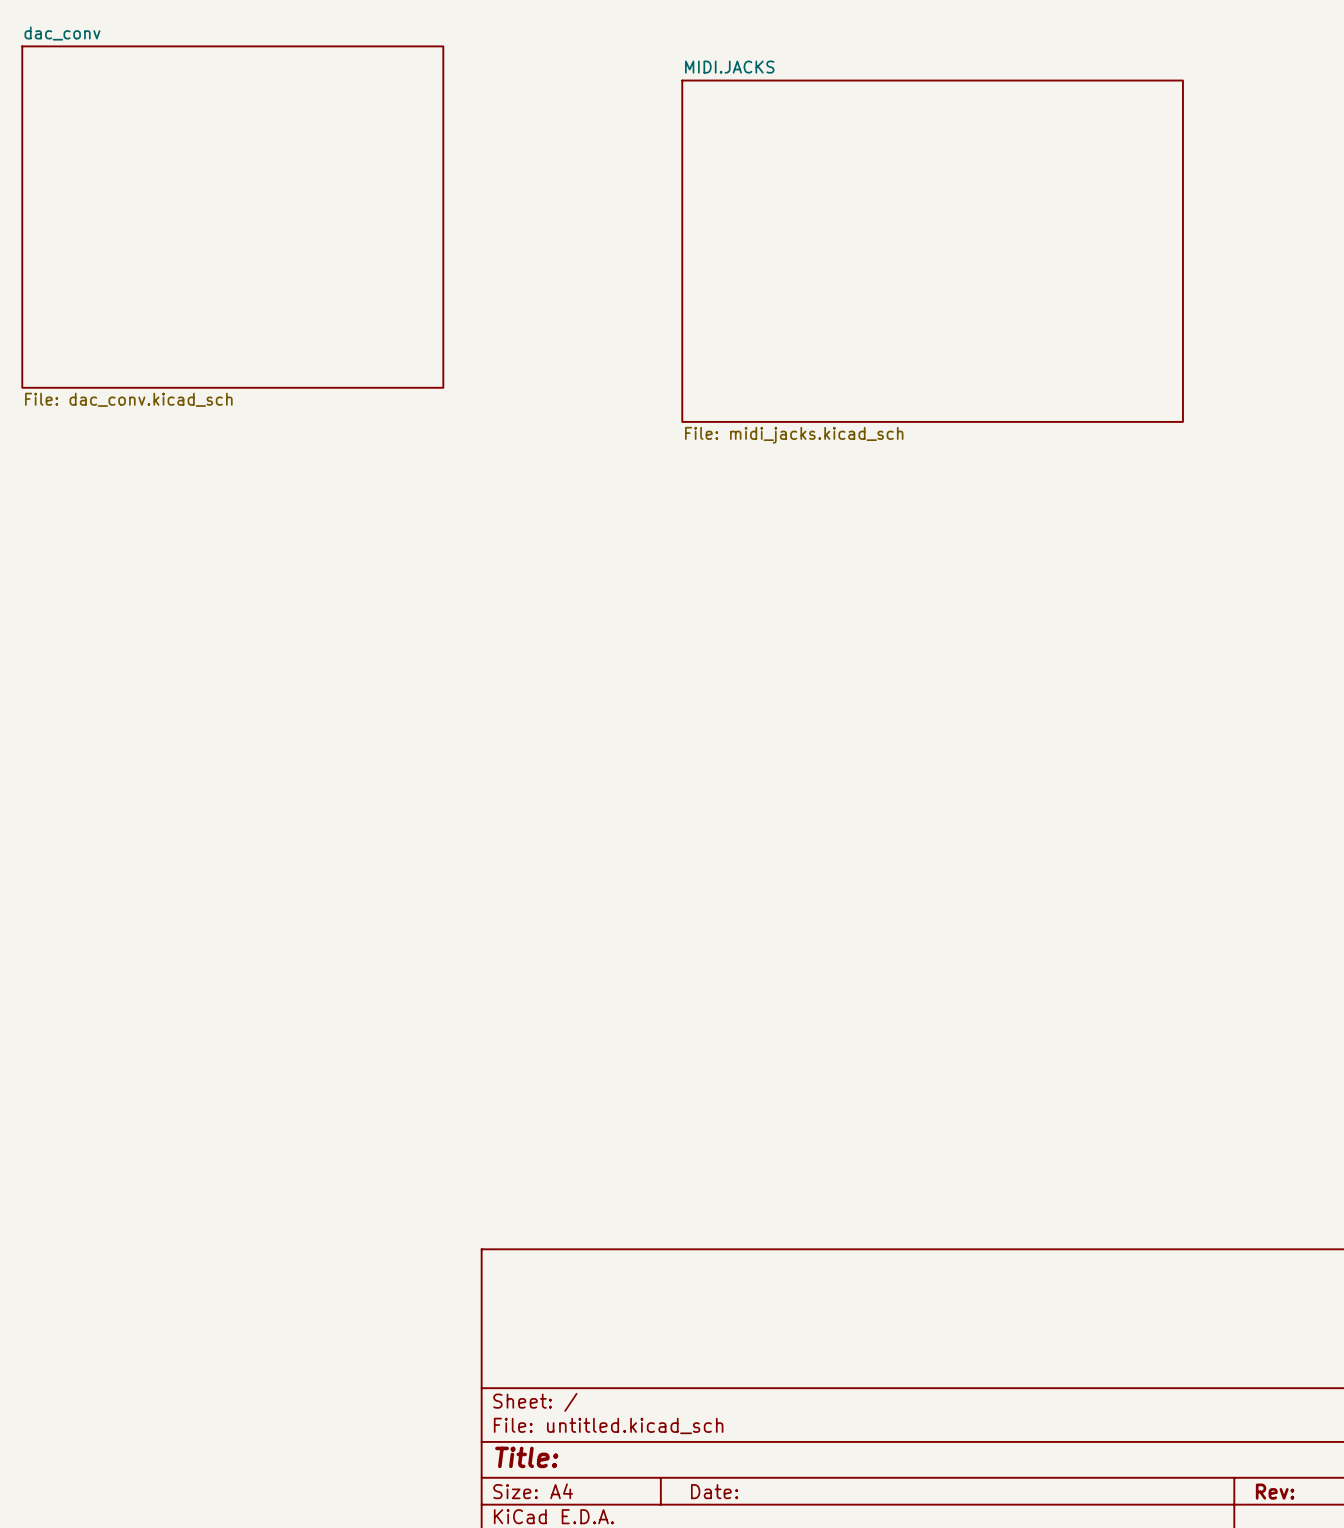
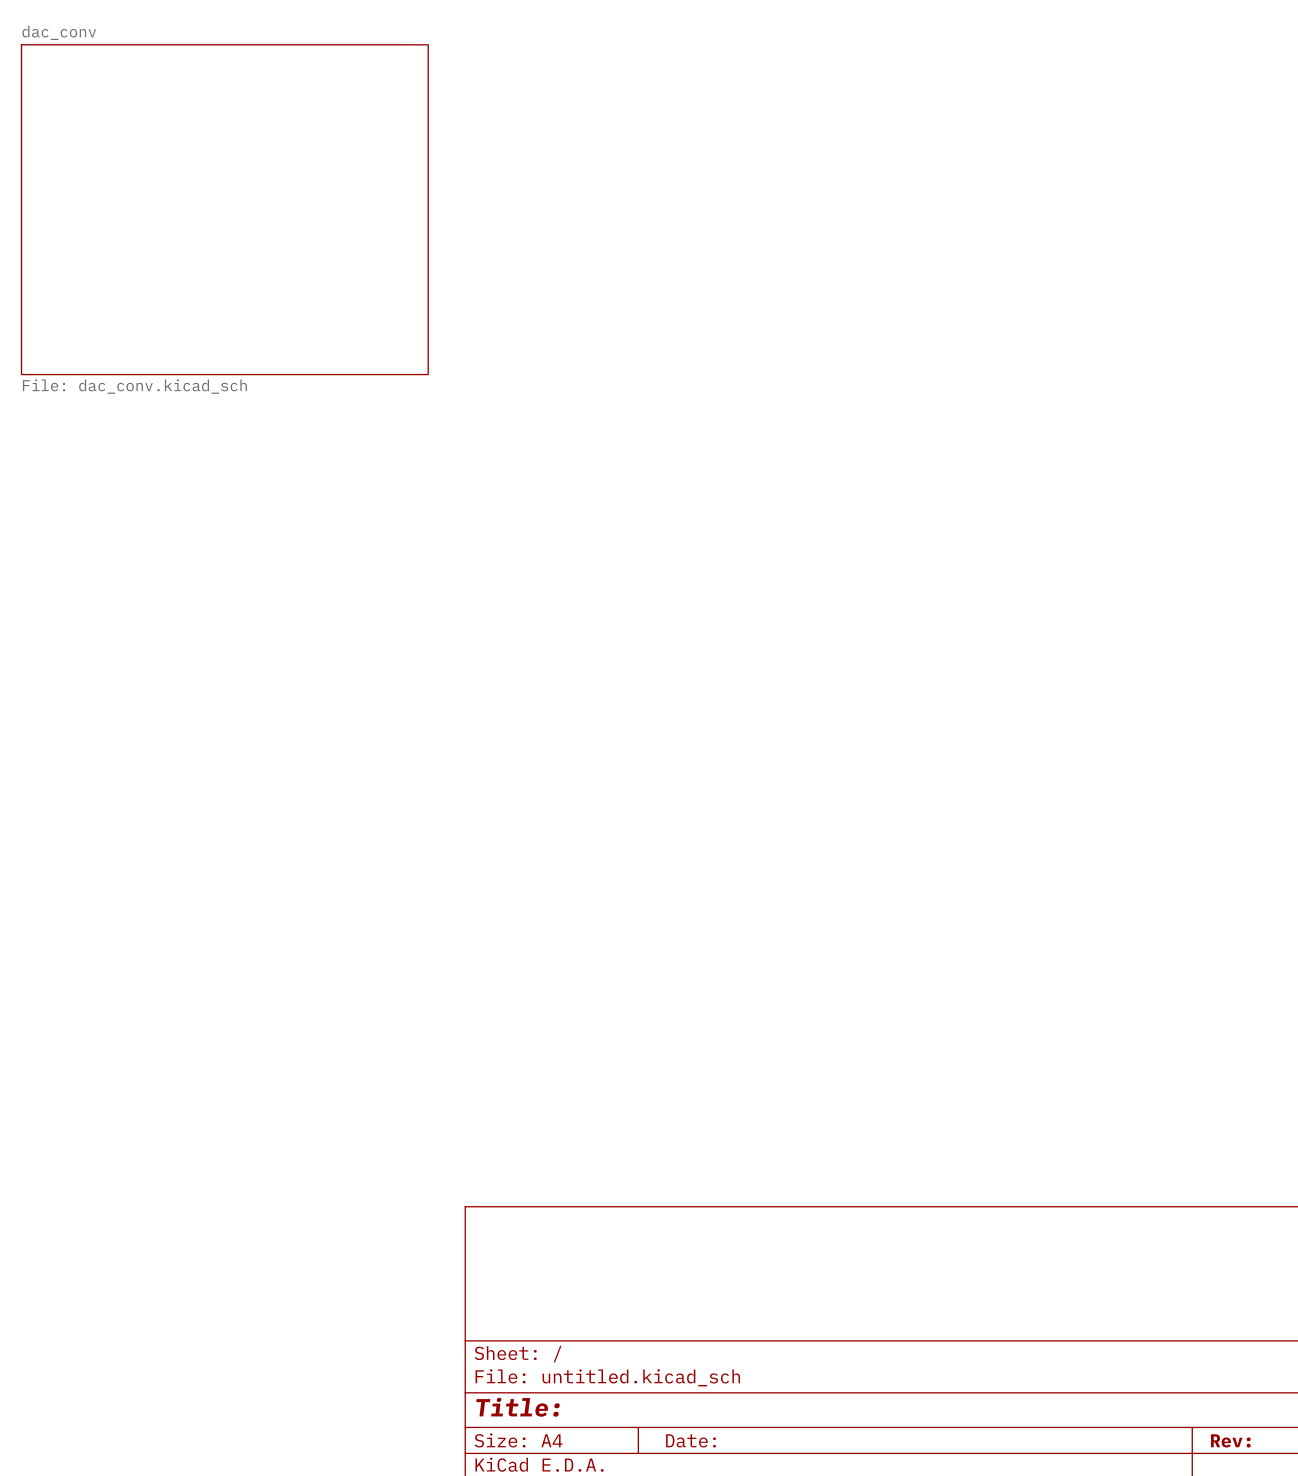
sheet MIDI.JACKS: File: midi_jacks.kicad_sch (932, 251) -> none

